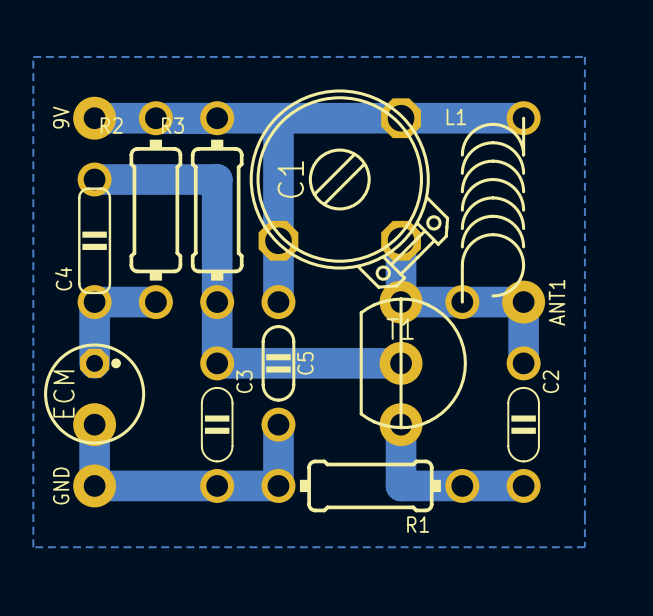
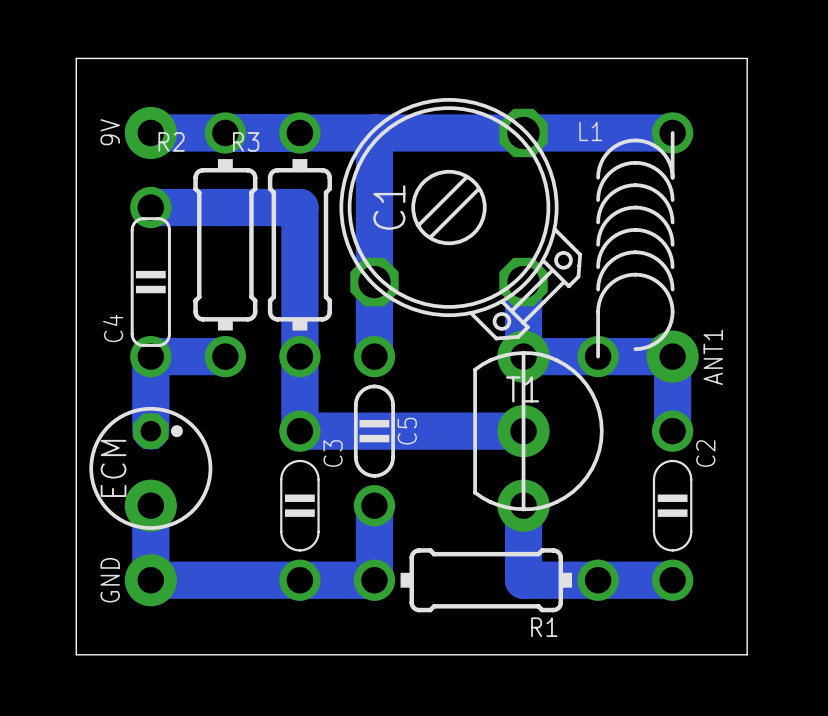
bottom zone outline: (33, 56) (33, 547) (584, 547) (584, 56) (33, 56) -> none
board edge: none -> (76, 58) (76, 654) (747, 654) (747, 58) (76, 58)

